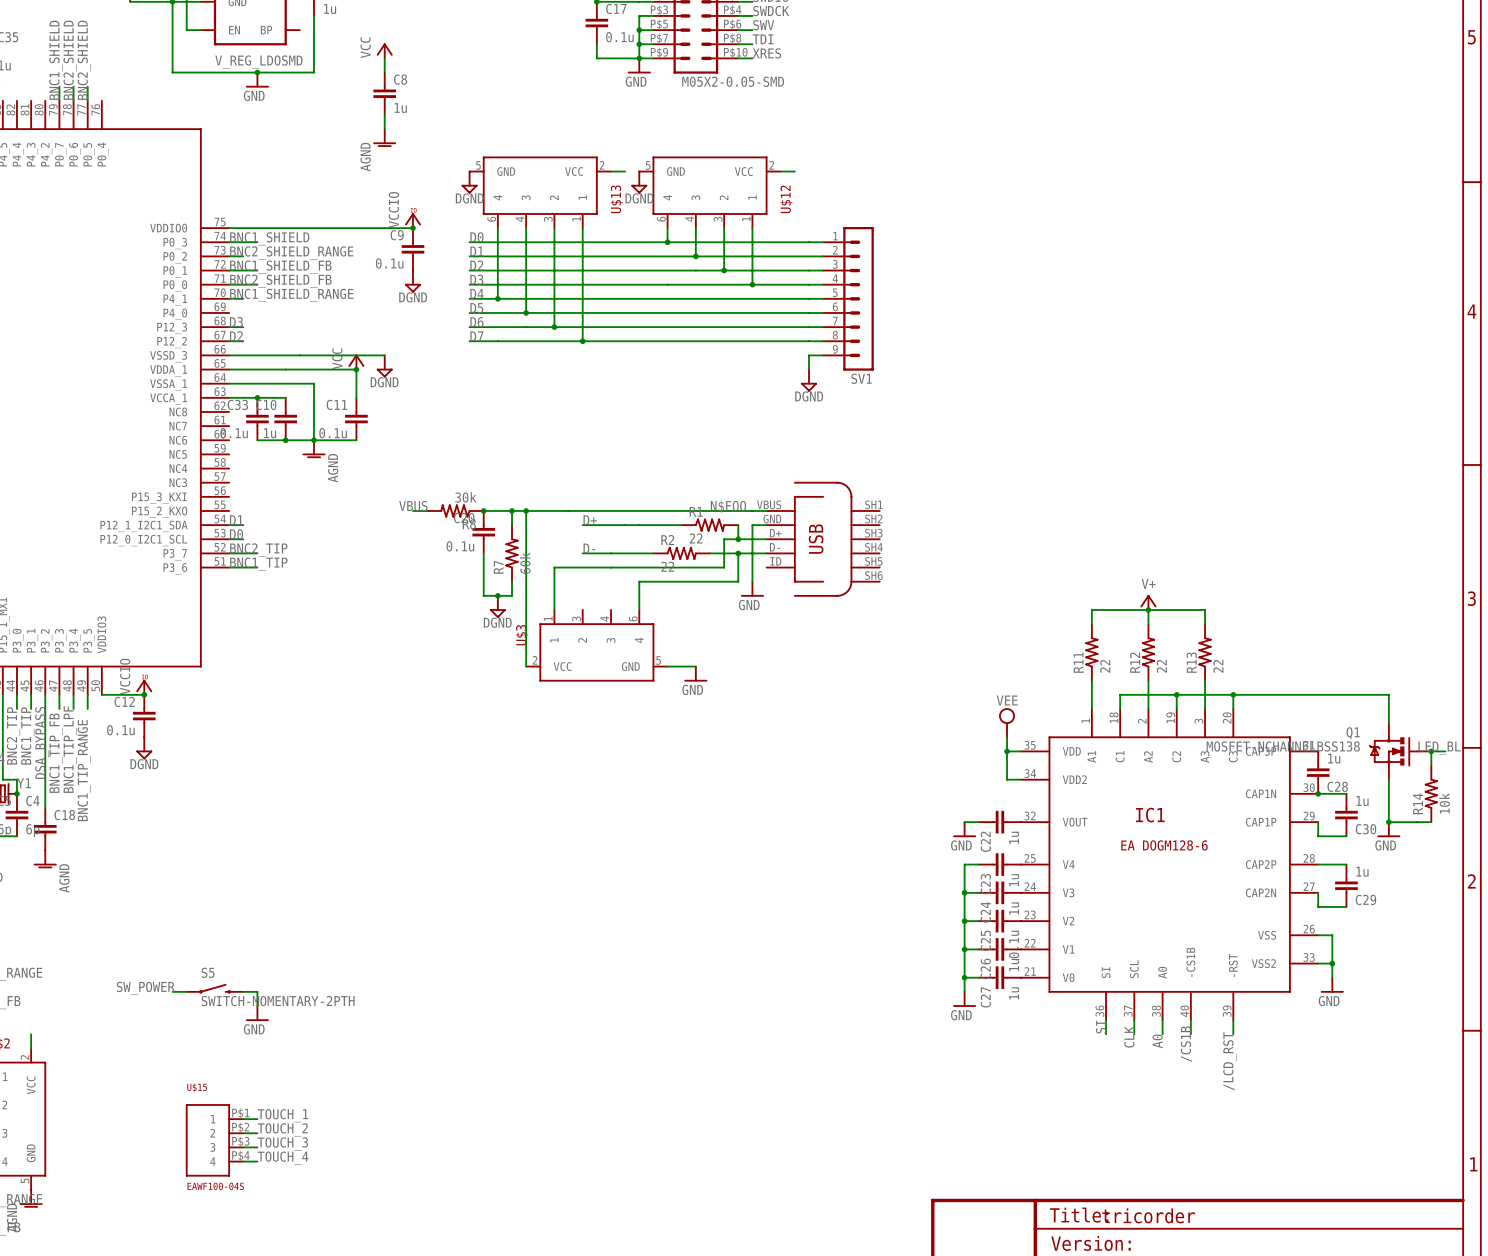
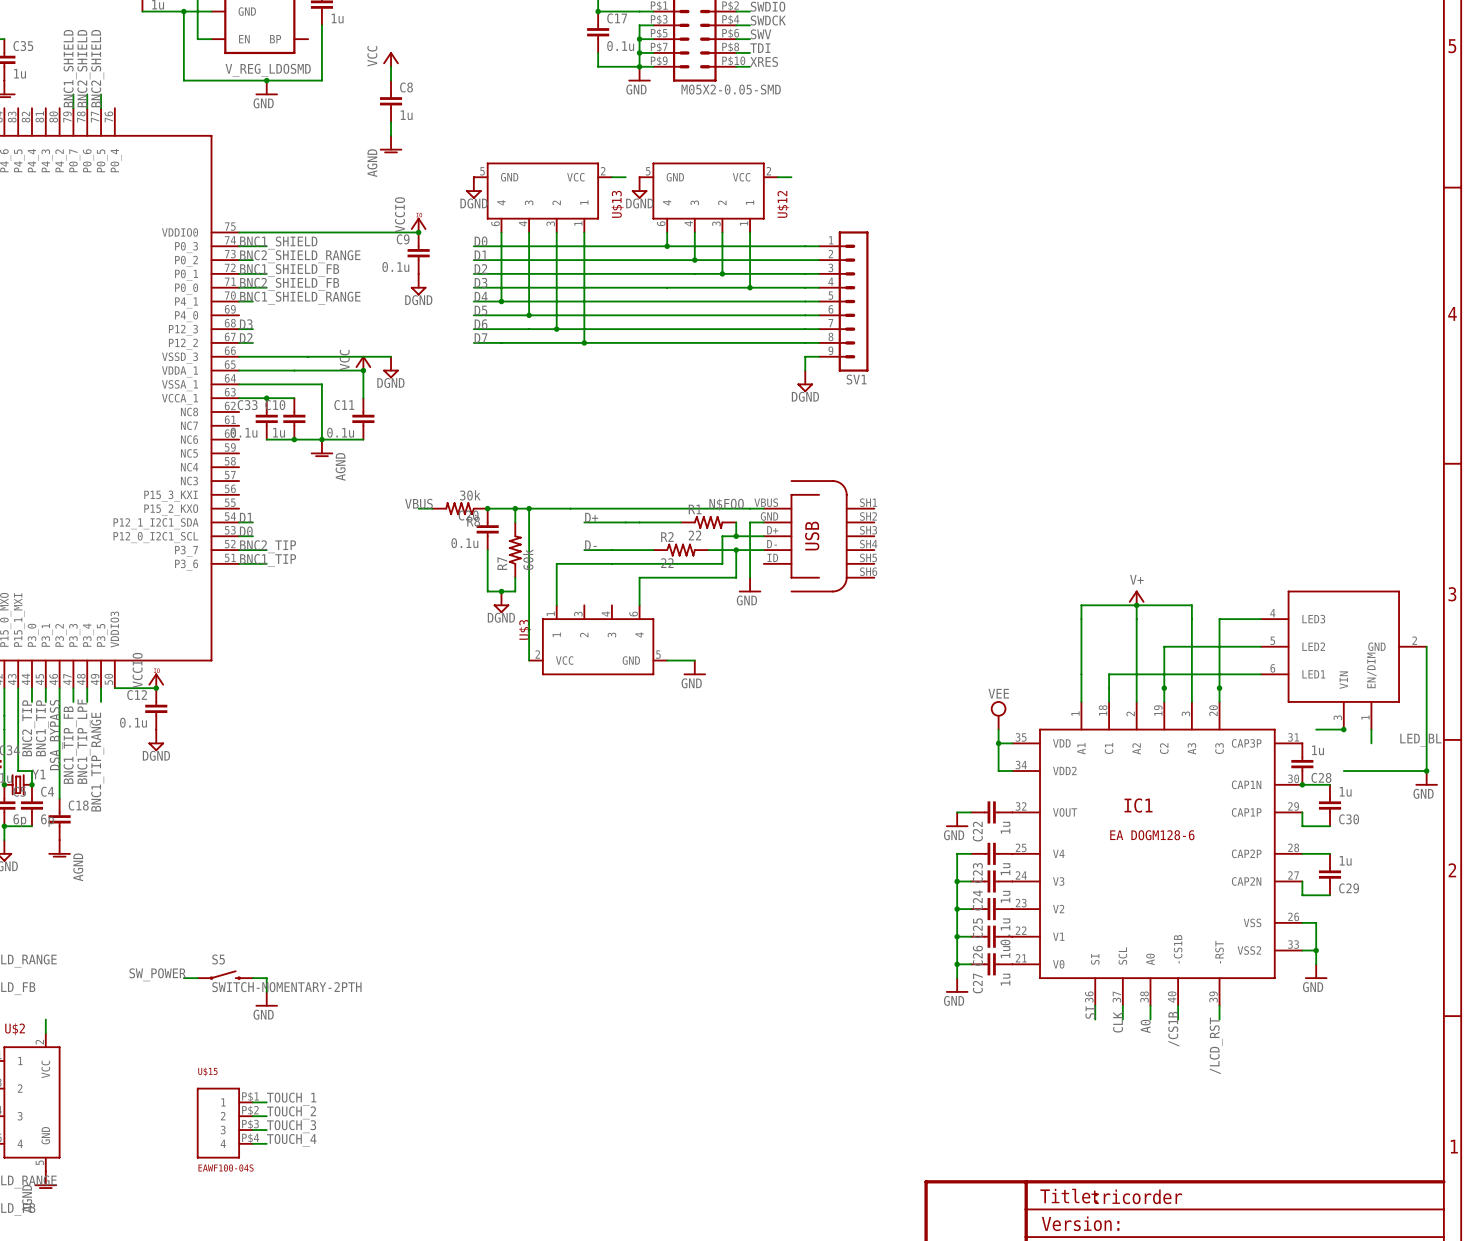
wire: none -> (1260, 619) (1219, 619) (1219, 688)
R11: 22 (1091, 652) -> none
R12: 22 (1148, 652) -> none
R13: 22 (1205, 652) -> none
wire: none -> (1260, 646) (1164, 646) (1164, 688)
wire: none -> (1426, 646) (1426, 771) (1343, 771)
part: none -> (1343, 660)
wire: (1120, 694) (1388, 694) (1388, 723) -> (1109, 688) (1109, 674) (1260, 674)
wire: none -> (1316, 729) (1343, 729)
junction: none -> (1343, 729)
Q1: MOSFET-NCHANNELBSS138 (1400, 751) -> none
junction position: (1431, 751) -> (1426, 771)
wire: (1445, 751) (1431, 751) (1431, 765) -> none
wire: (1388, 779) (1388, 822) (1431, 822) -> none
R14: 10k (1431, 793) -> none
junction: (1388, 822) -> none
power symbol position: GND (1388, 829) -> GND (1426, 778)

